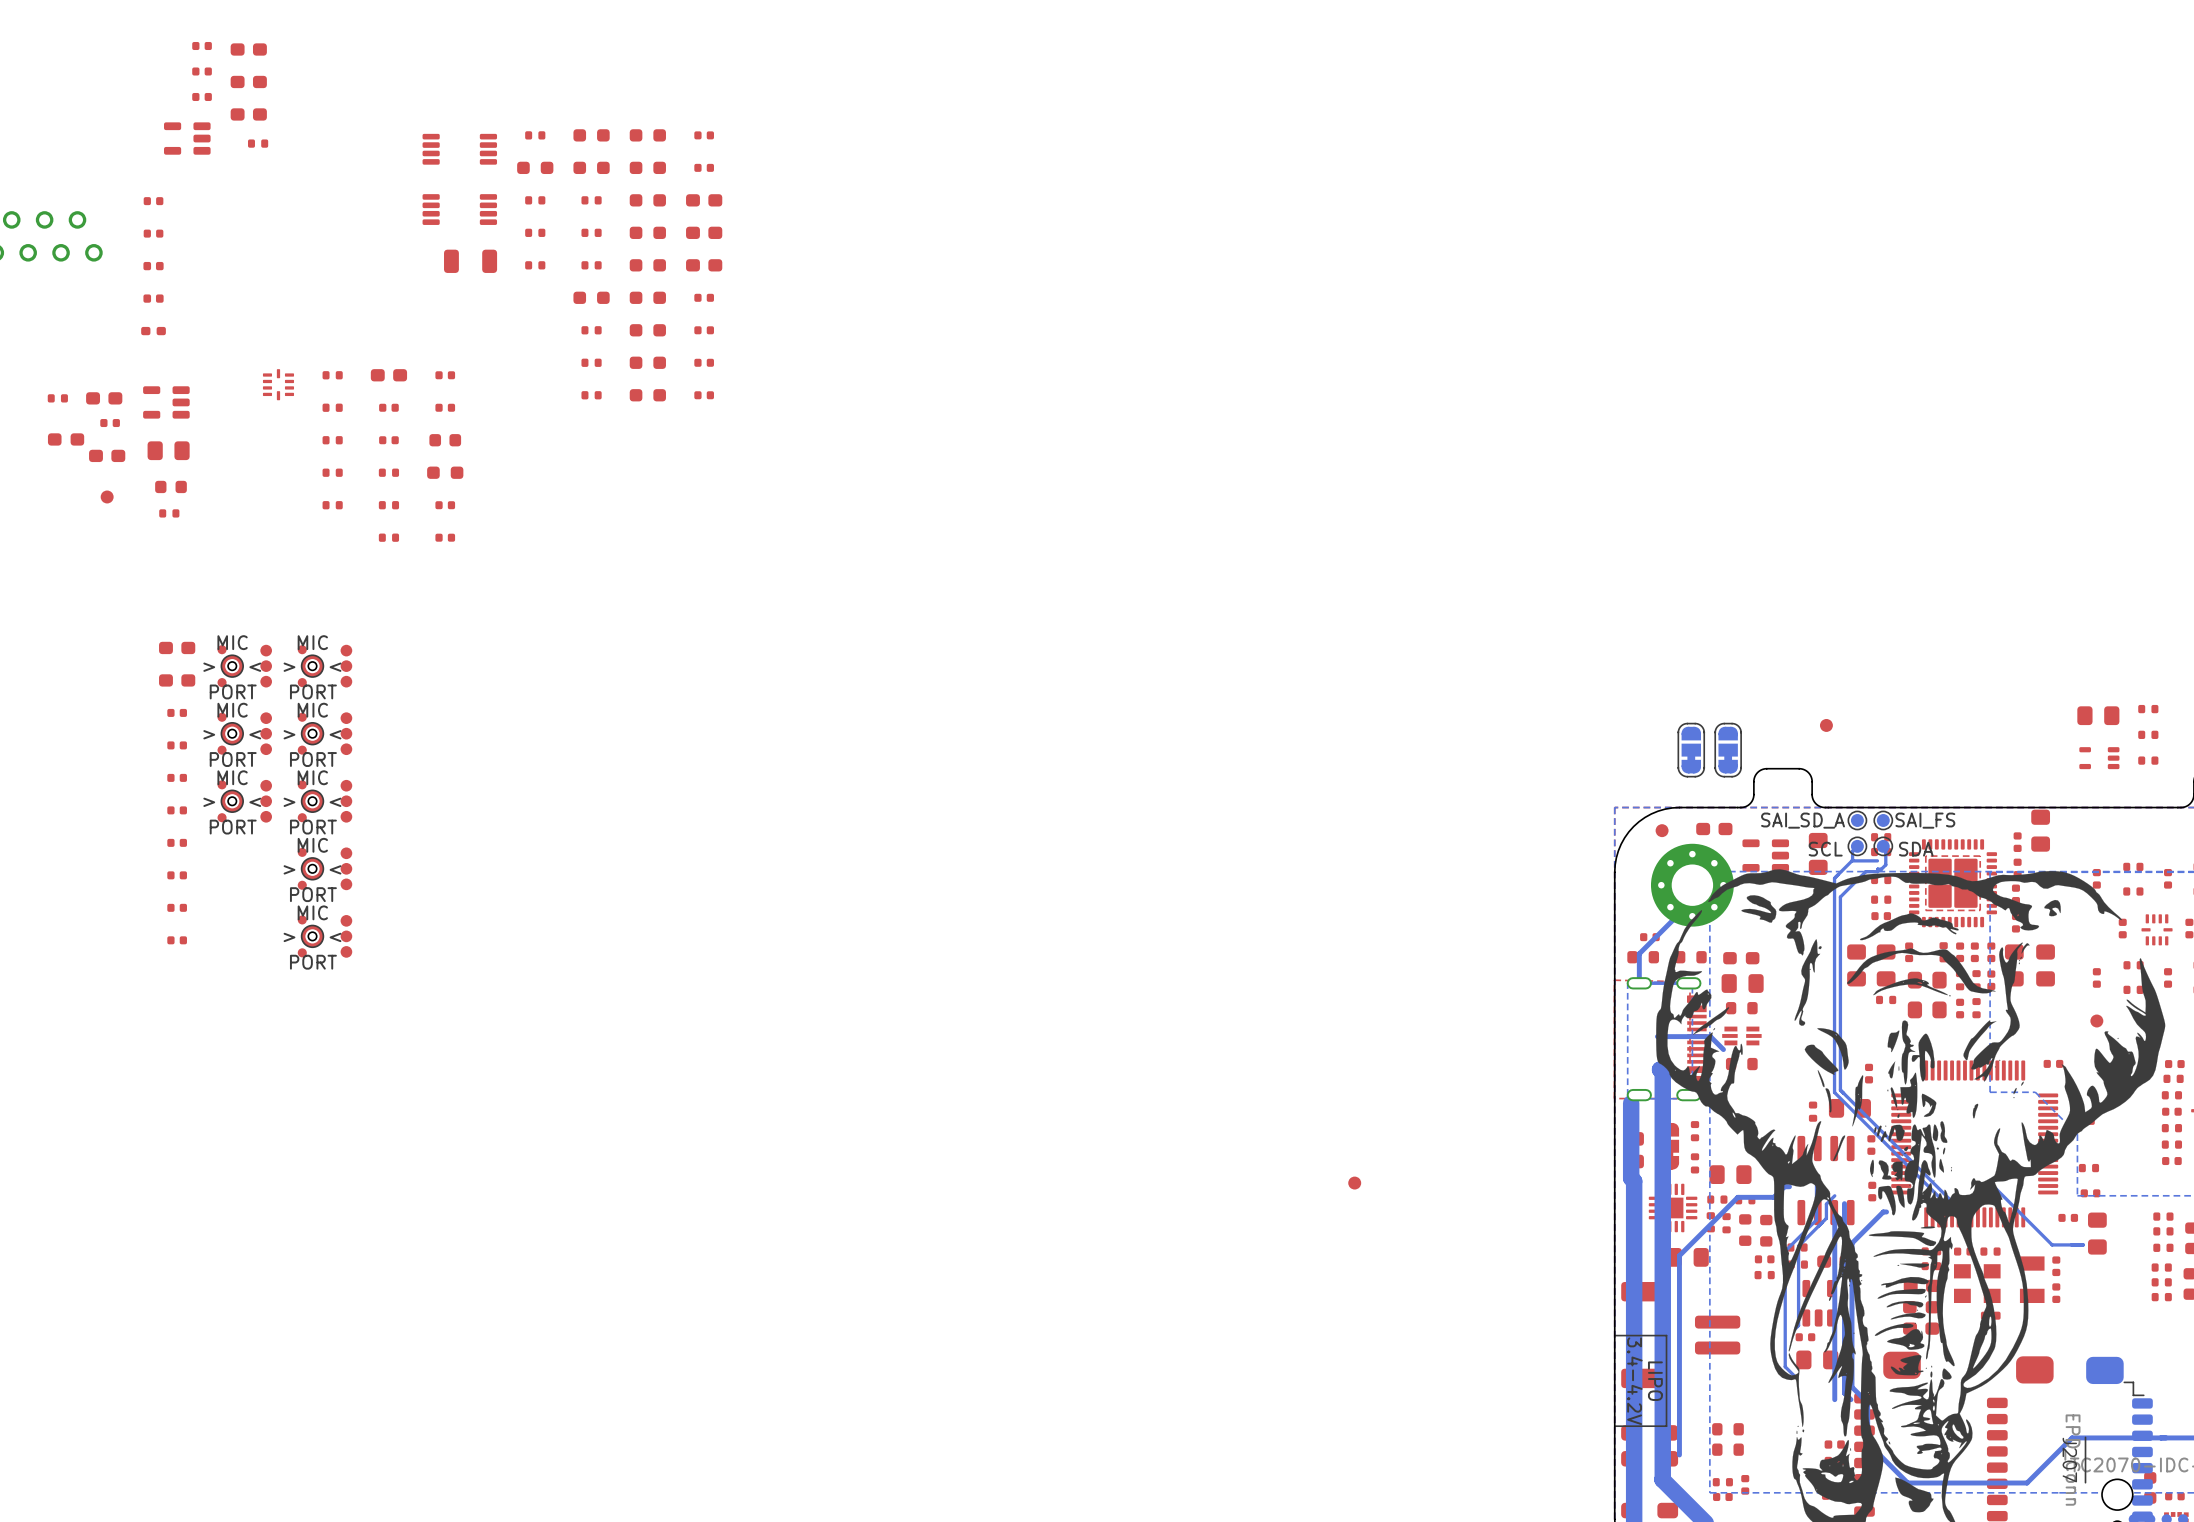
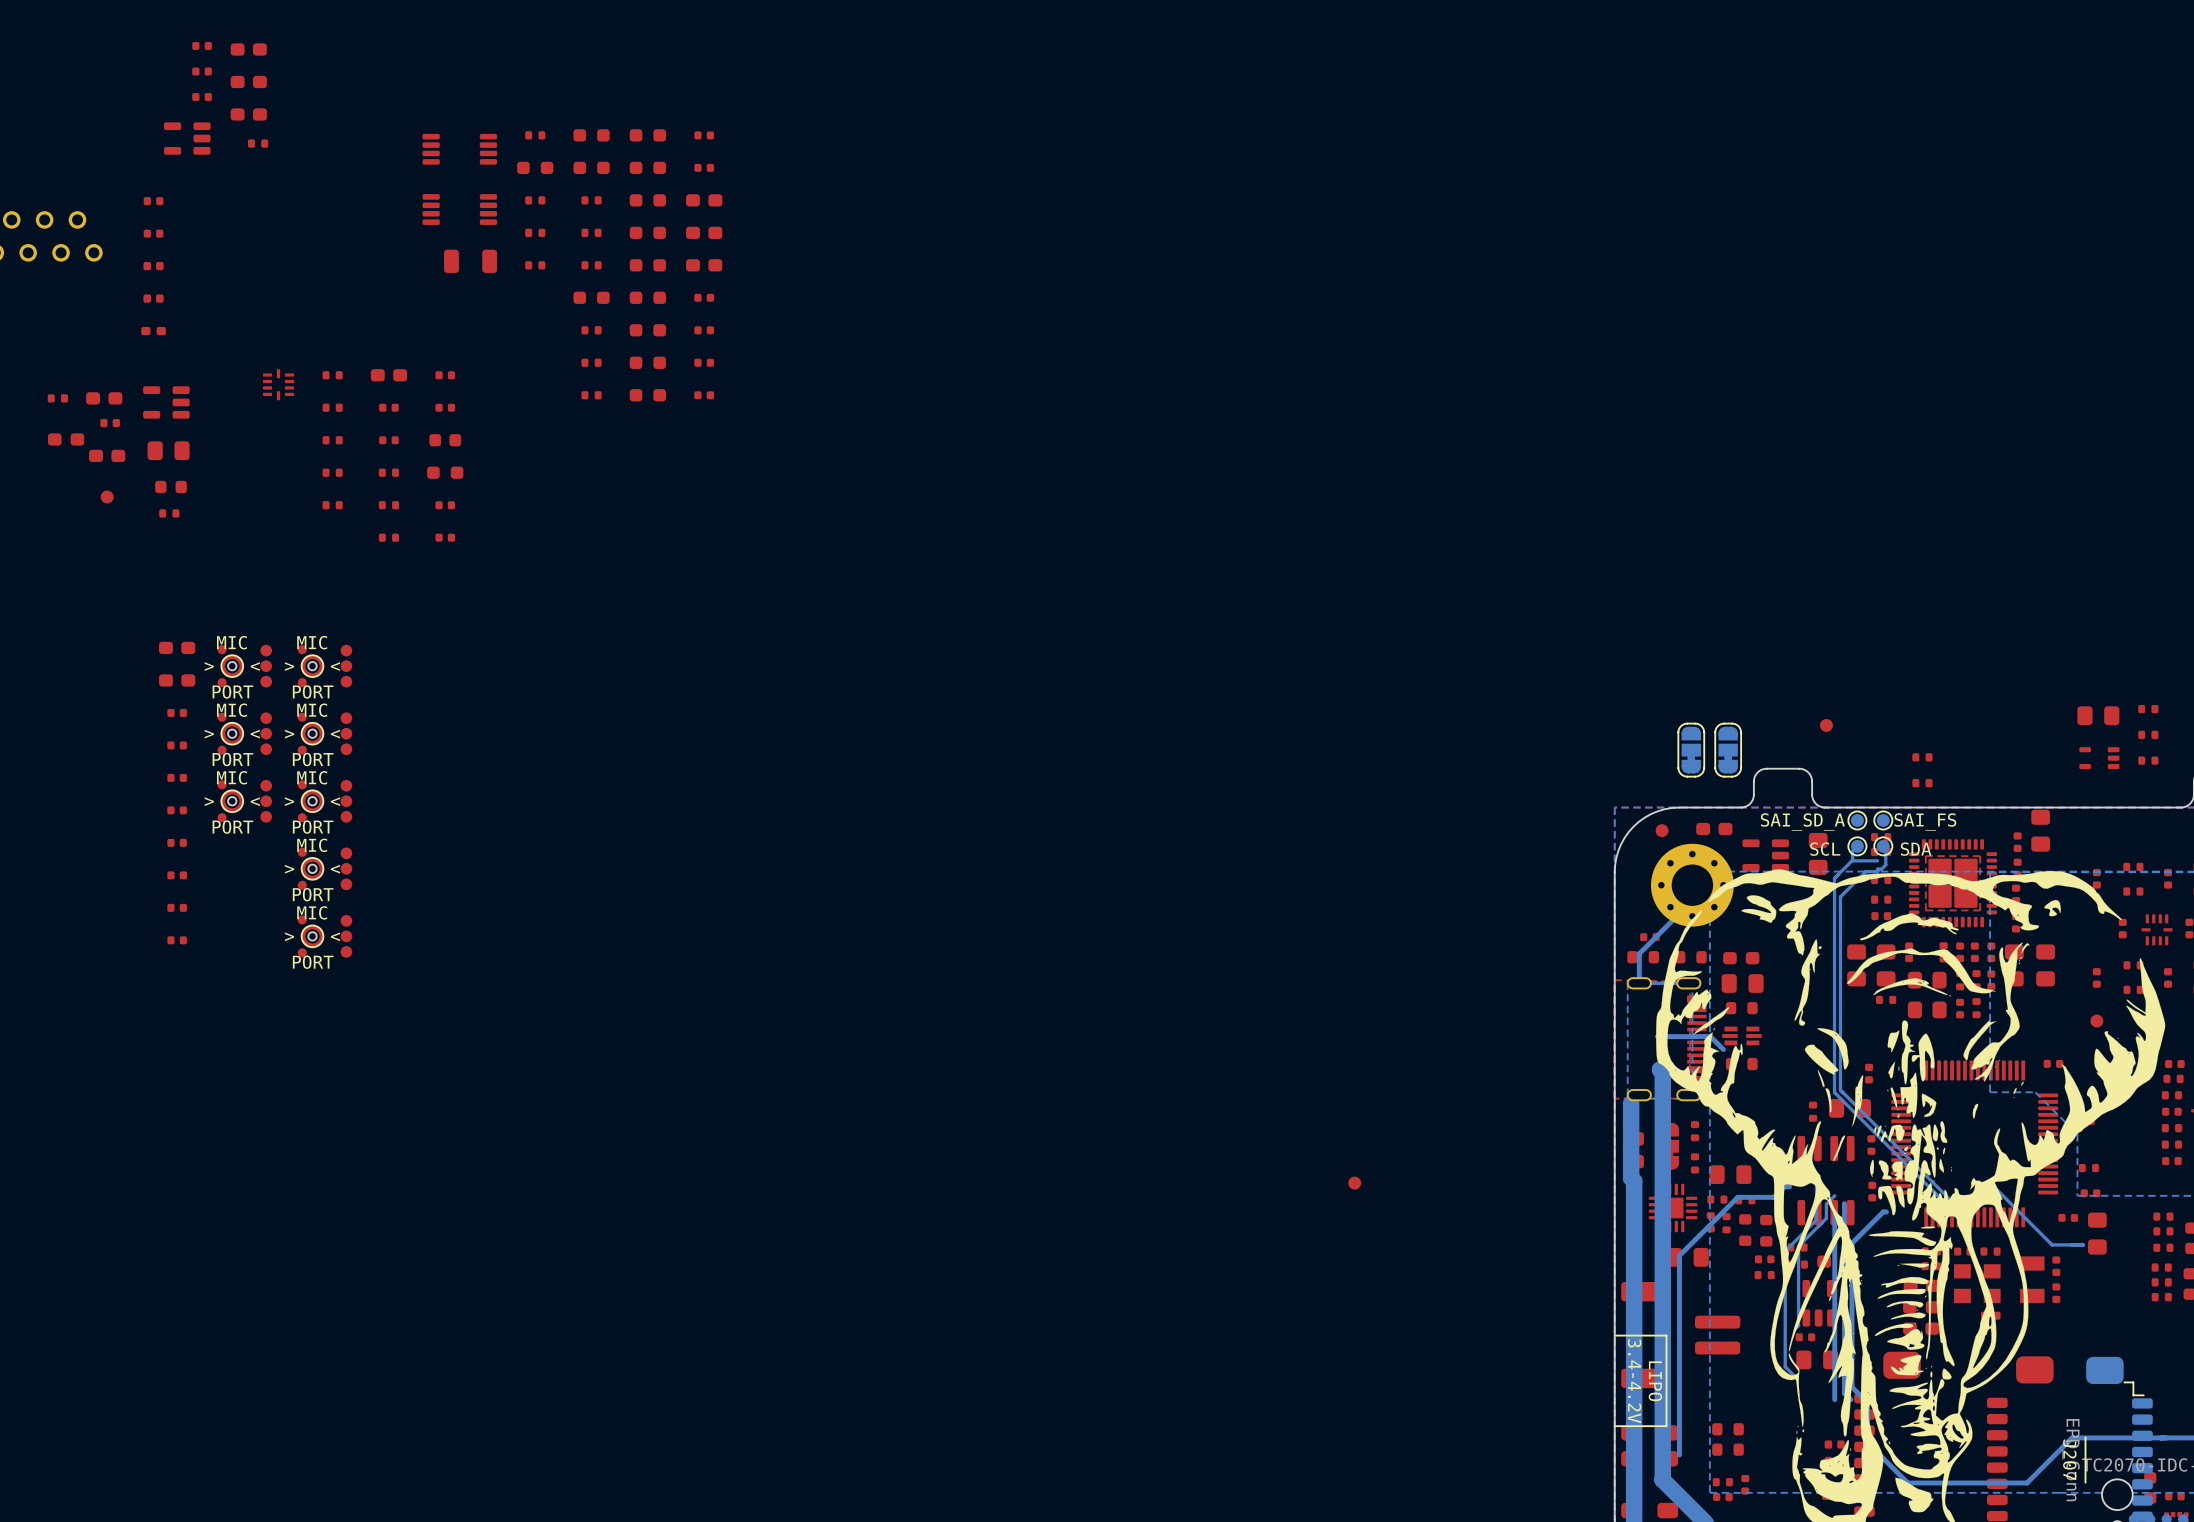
part: none -> (1922, 757)
part: none -> (1922, 783)

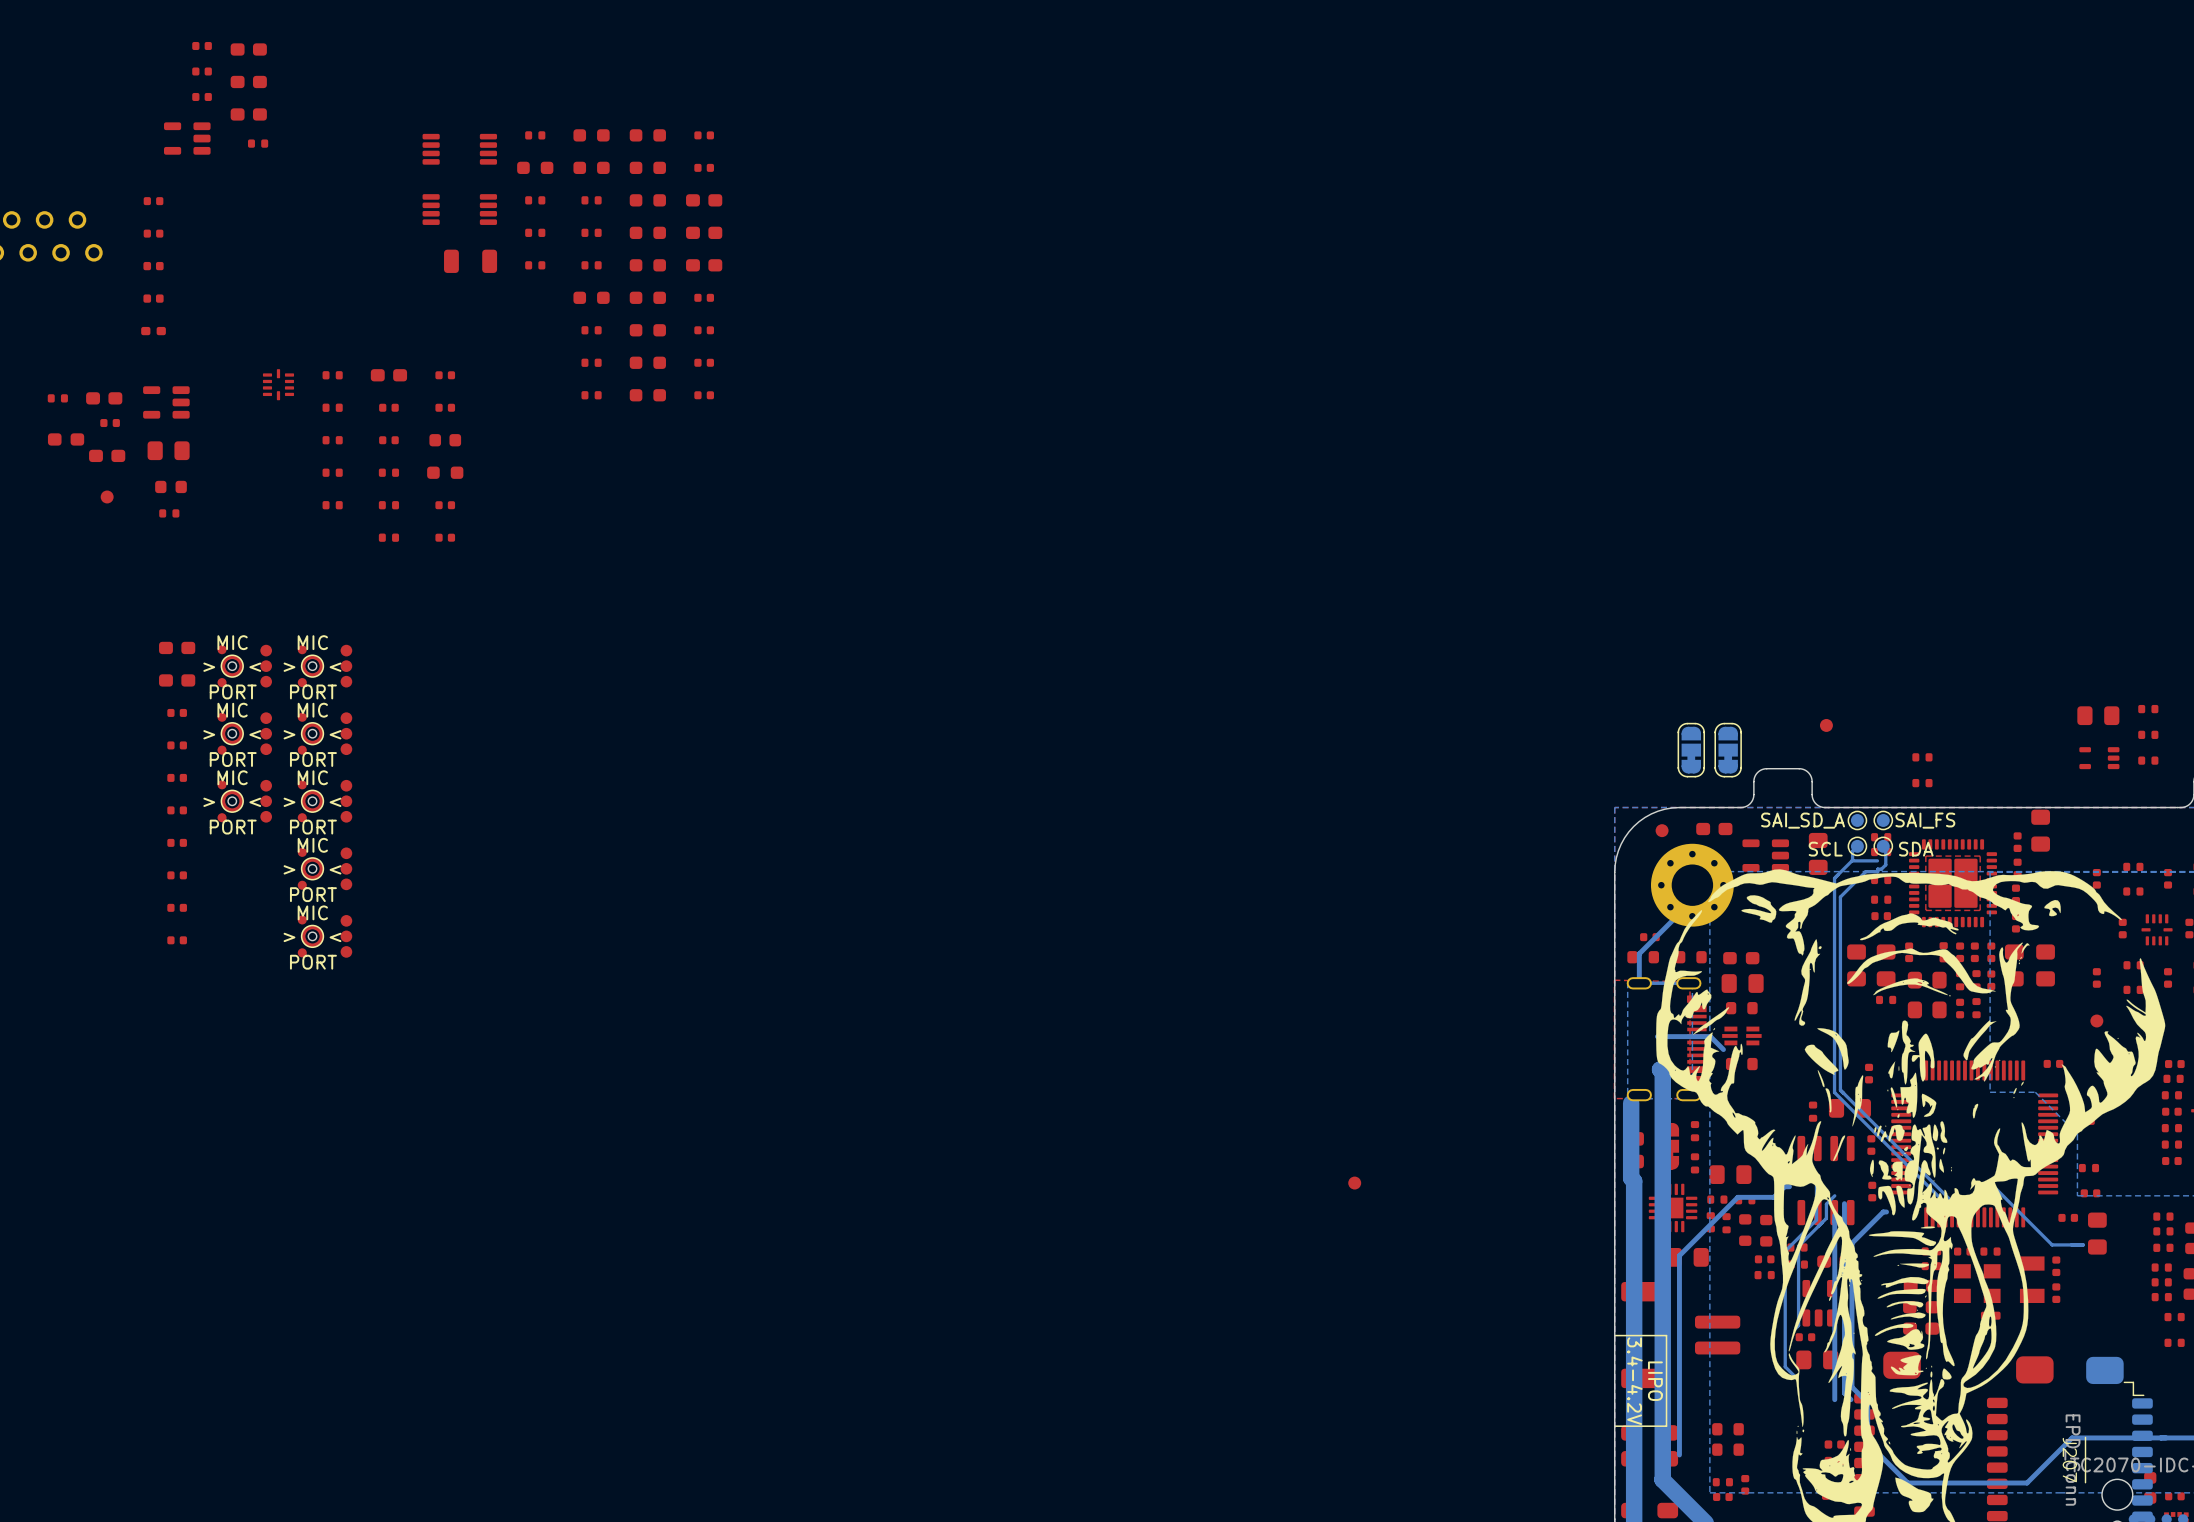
part: none -> (2174, 1317)
part: none -> (2174, 1342)

